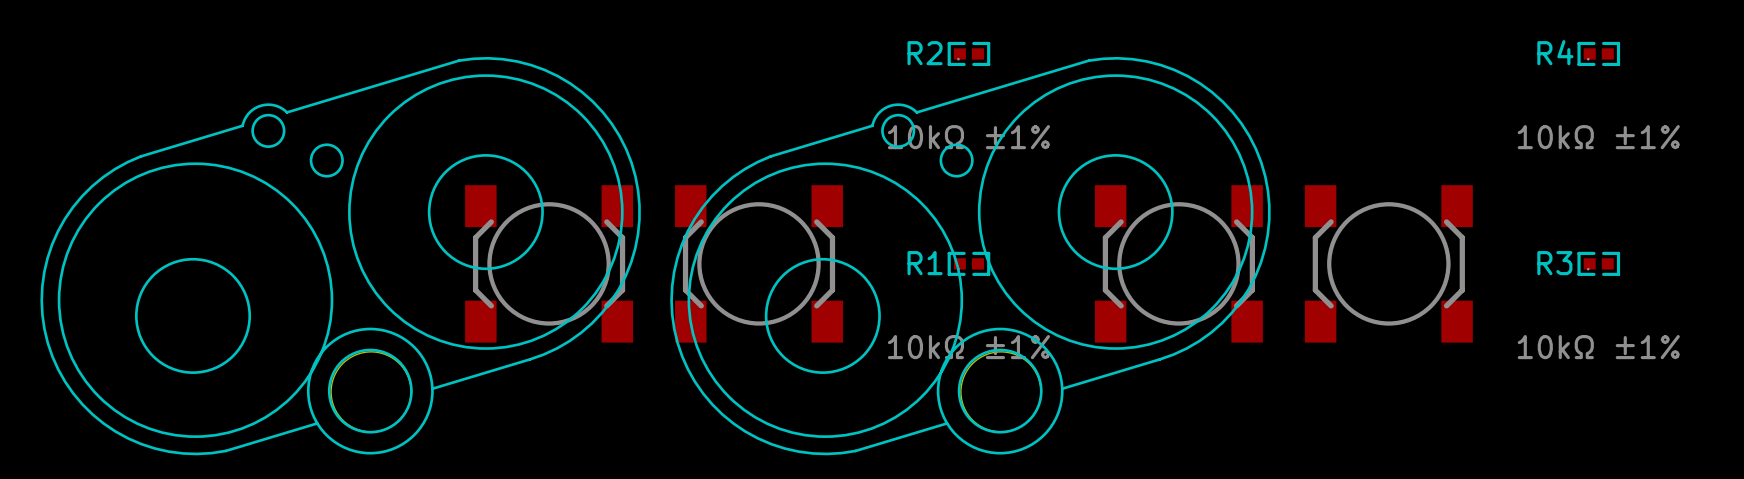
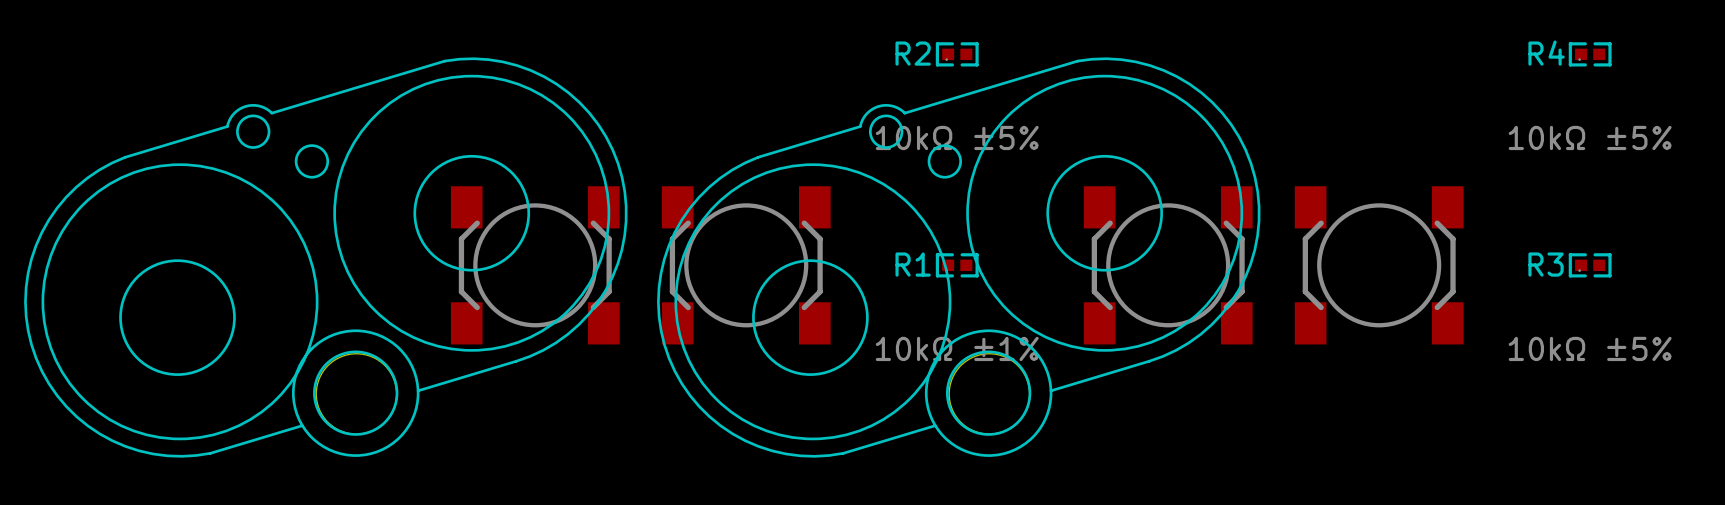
R2 value: 10kΩ ±1% (968, 137) -> 10kΩ ±5% (957, 137)
R4 value: 10kΩ ±1% (1598, 137) -> 10kΩ ±5% (1590, 137)
R3 value: 10kΩ ±1% (1598, 347) -> 10kΩ ±5% (1590, 348)

